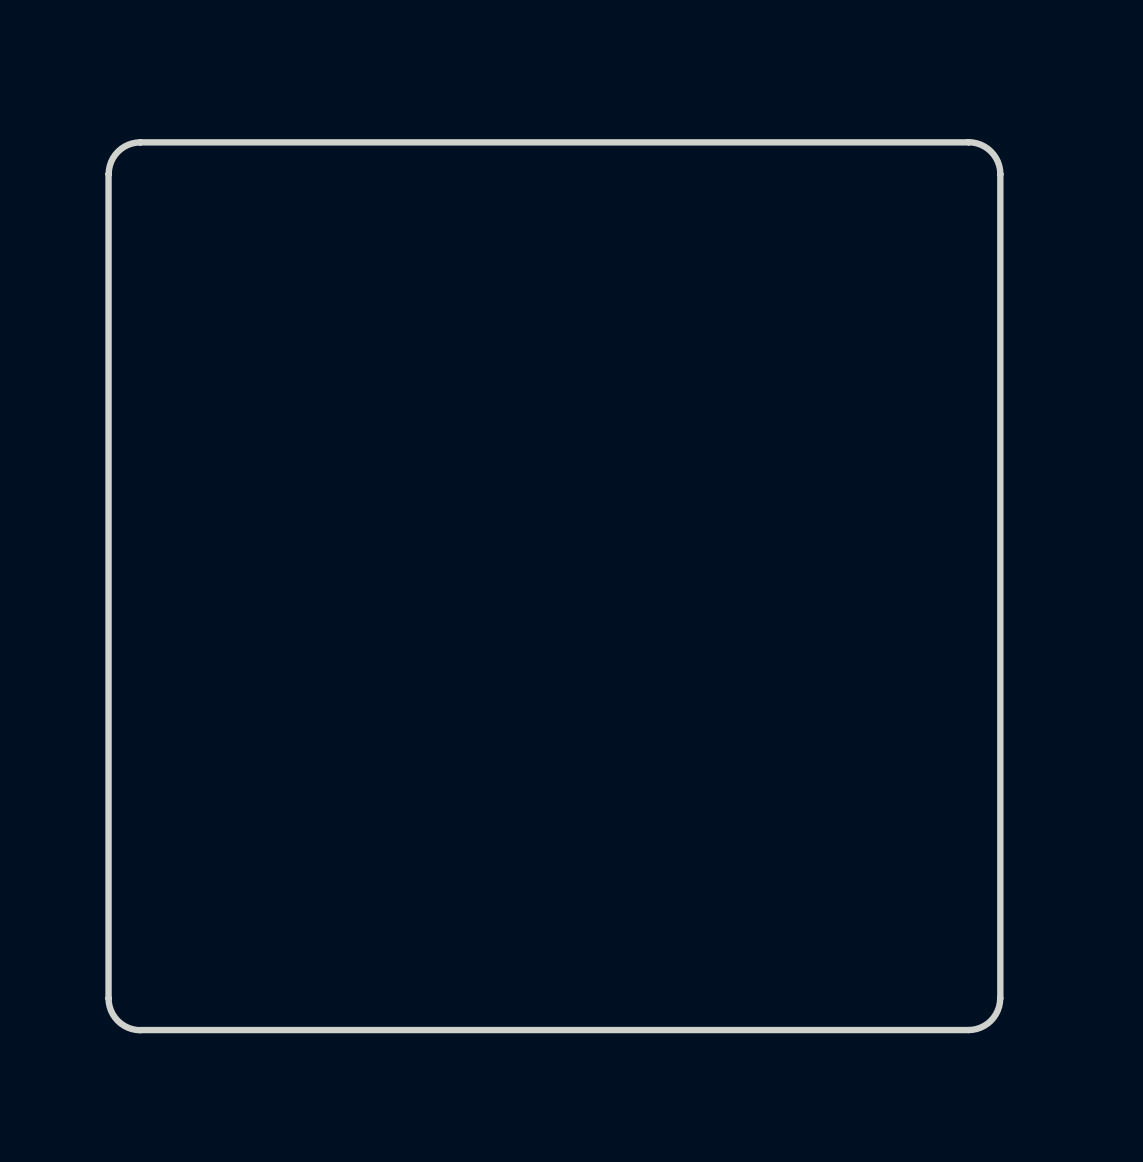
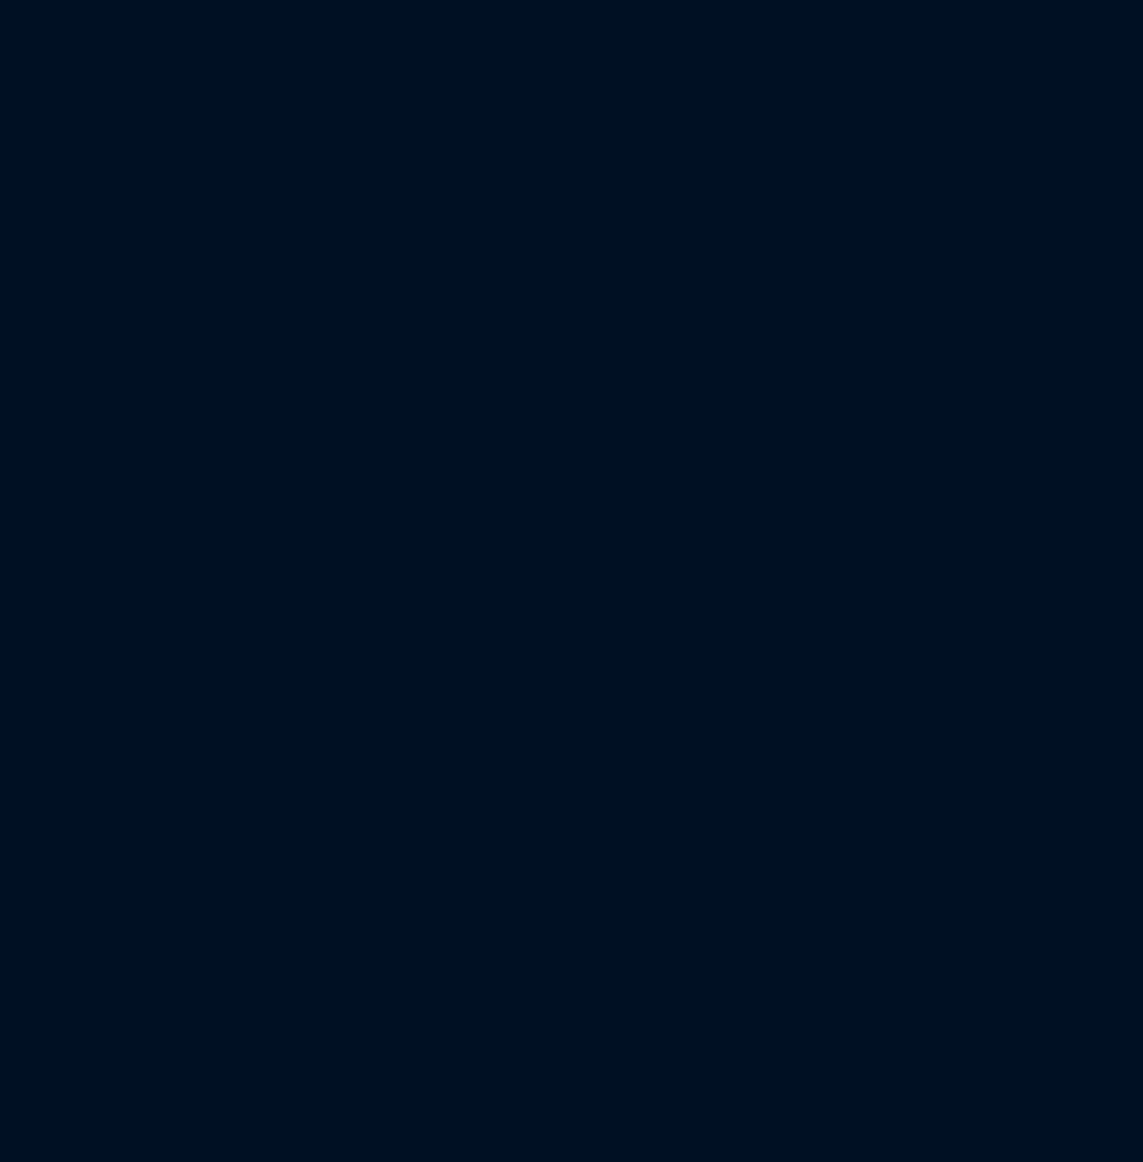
board edge: (140, 142) (968, 142) (980, 144) (991, 151) (997, 161) (1000, 174) (1000, 998) (997, 1010) (990, 1020) (980, 1027) (968, 1030) (140, 1030) (128, 1027) (117, 1020) (110, 1010) (108, 998) (108, 174) (111, 161) (117, 151) (128, 144) (140, 142) -> none

